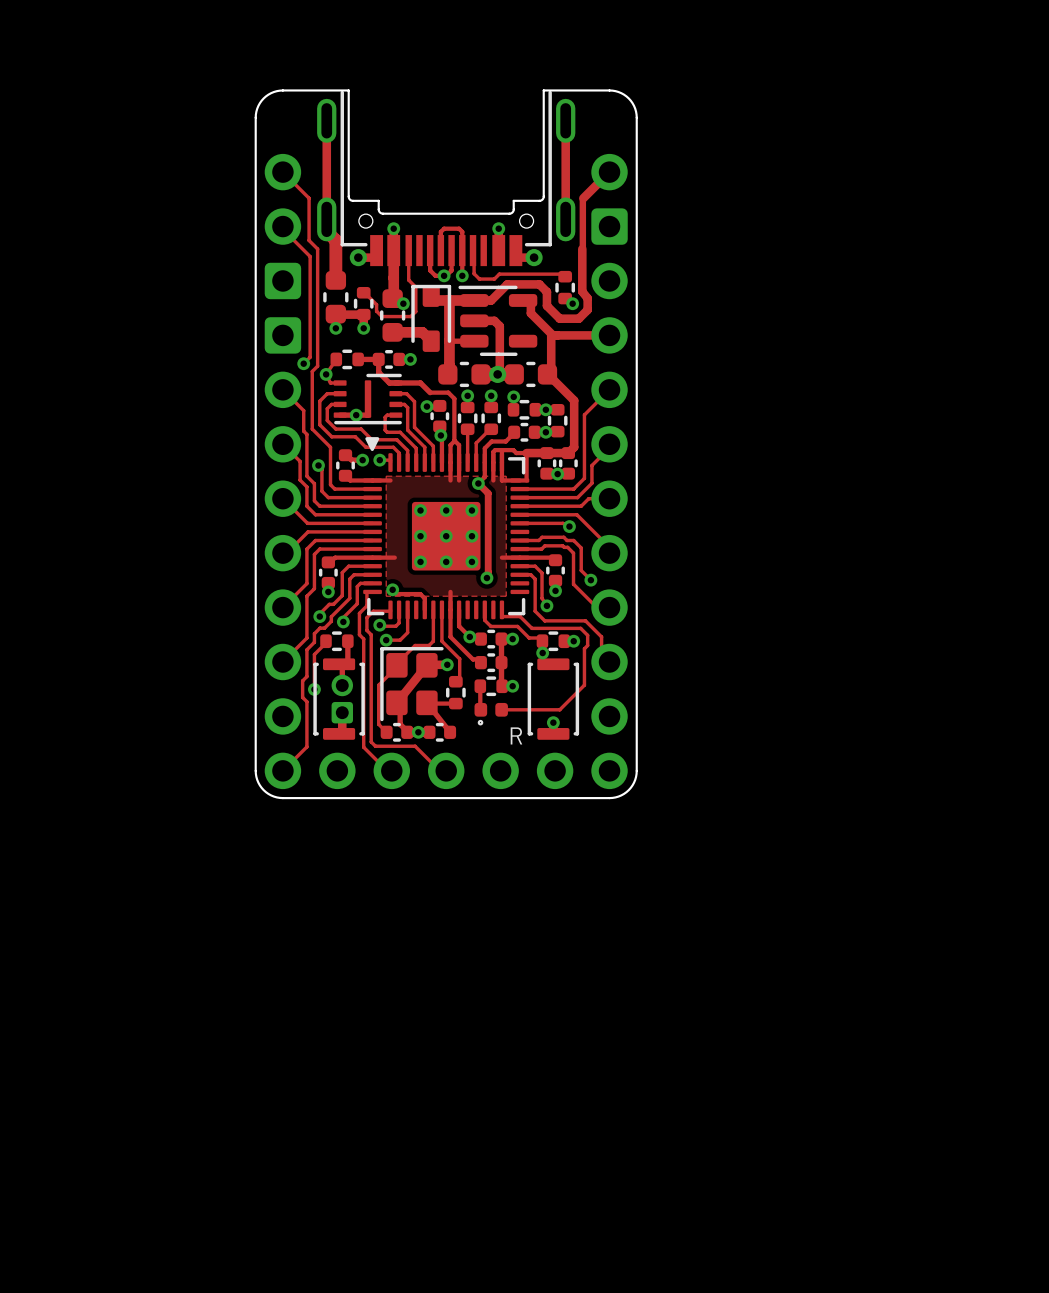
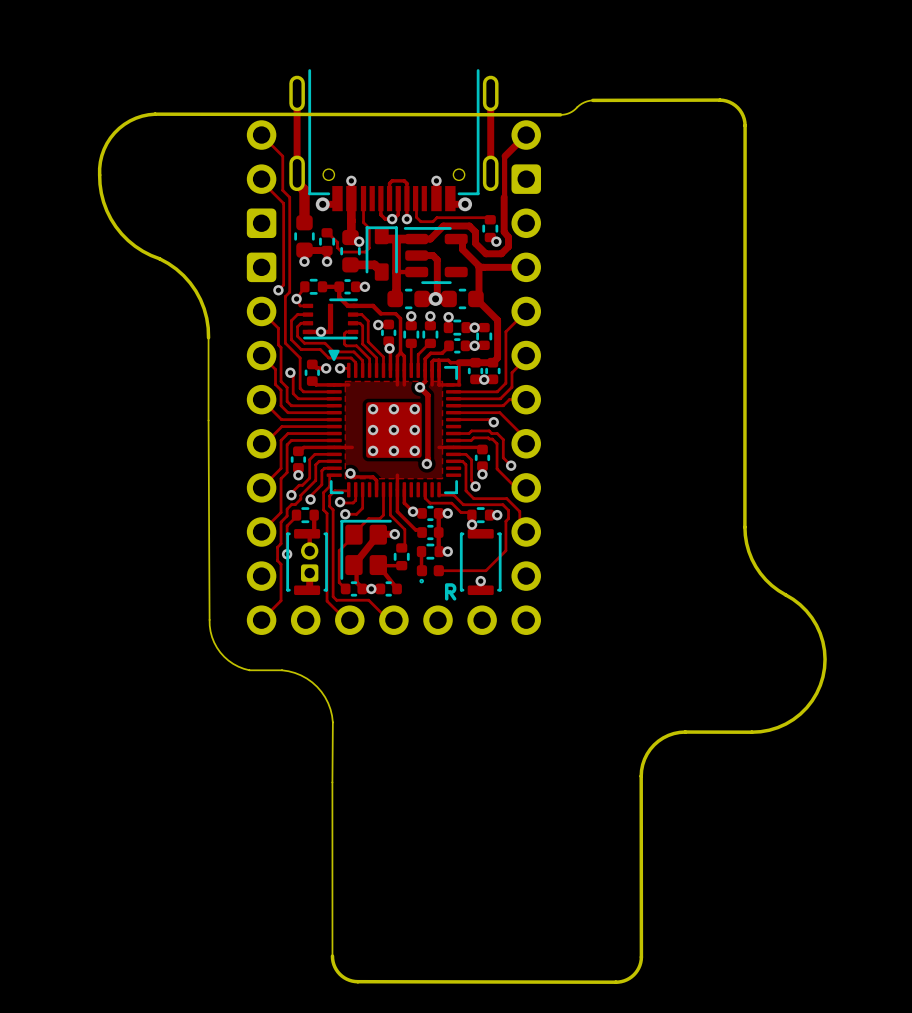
board edge: (282, 90) (348, 90) (348, 197) (352, 200) (378, 200) (378, 210) (383, 213) (510, 213) (513, 210) (513, 200) (541, 200) (543, 196) (543, 90) (615, 91) (626, 96) (634, 105) (636, 117) (636, 770) (632, 785) (621, 795) (609, 798) (282, 798) (268, 793) (258, 782) (255, 770) (255, 117) (258, 105) (263, 98) (271, 93) (282, 90) -> none
board edge: none -> (719, 100) (592, 100) (581, 103) (569, 112) (560, 114) (155, 114) (142, 116) (124, 124) (114, 132) (104, 149) (100, 162) (100, 184) (103, 202) (110, 219) (121, 233) (135, 246) (168, 263) (183, 275) (200, 299) (206, 318) (208, 337) (209, 619) (214, 642) (228, 660) (243, 668) (288, 671) (306, 678) (321, 691) (330, 709) (332, 722) (332, 958) (336, 969) (346, 979) (357, 981) (615, 982) (629, 978) (637, 970) (641, 959) (641, 776) (642, 764) (647, 754) (658, 741) (673, 733) (760, 731) (777, 727) (793, 719) (806, 707) (820, 685) (824, 668) (824, 650) (816, 625) (800, 604) (765, 579) (755, 566) (746, 543) (744, 527) (745, 125) (743, 115) (737, 107) (729, 102) (719, 100)

